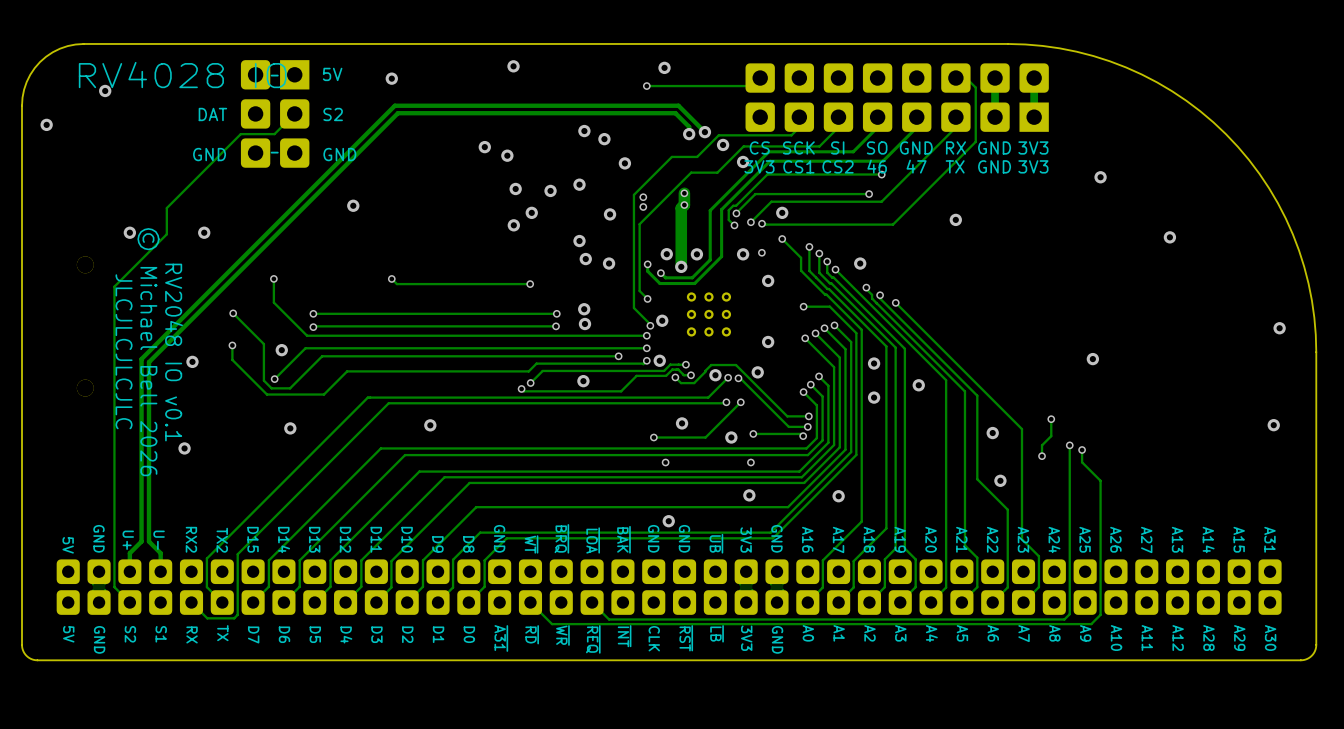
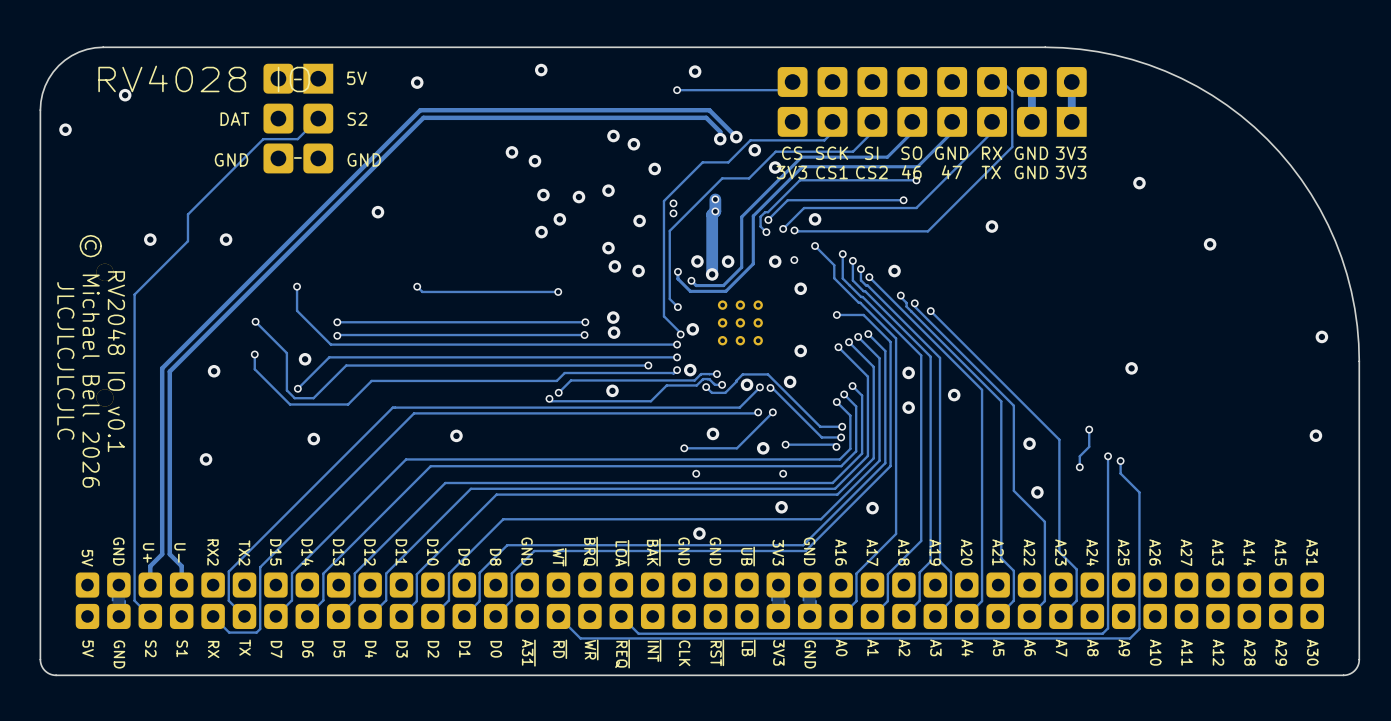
text position: JLCJLCJLCJLC (124, 351) -> JLCJLCJLCJLC (65, 360)
text position: © Michael Bell 2026 (148, 352) -> © Michael Bell 2026 (90, 361)
text position: RV2048 IO v0.1 (174, 352) -> RV2048 IO v0.1 (116, 361)

